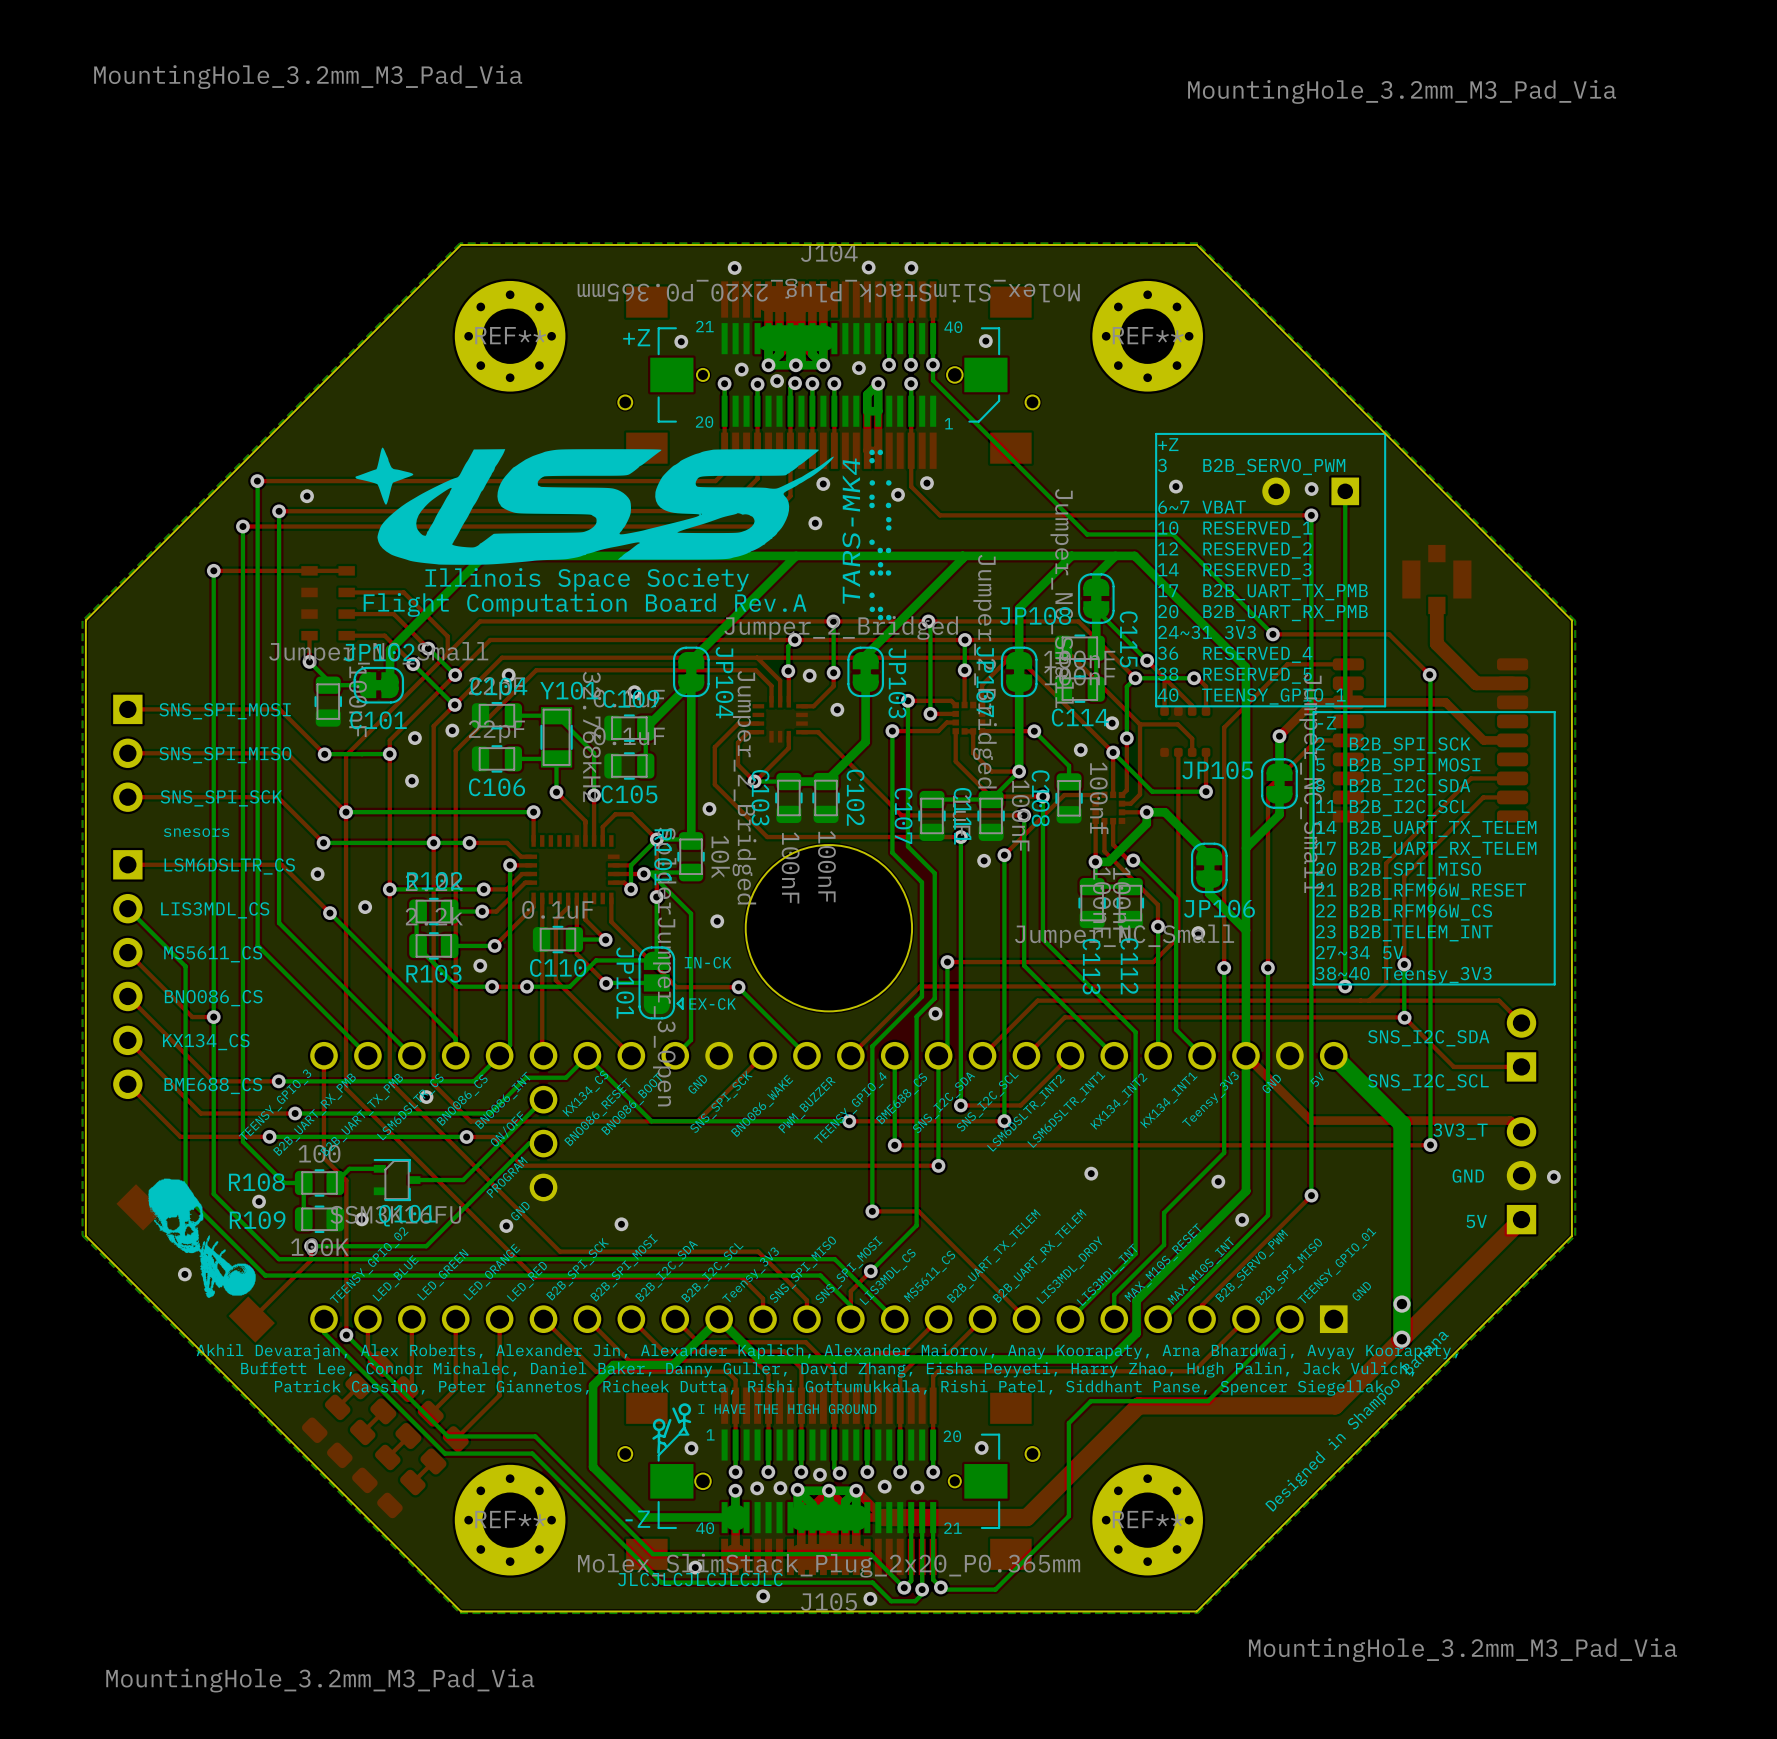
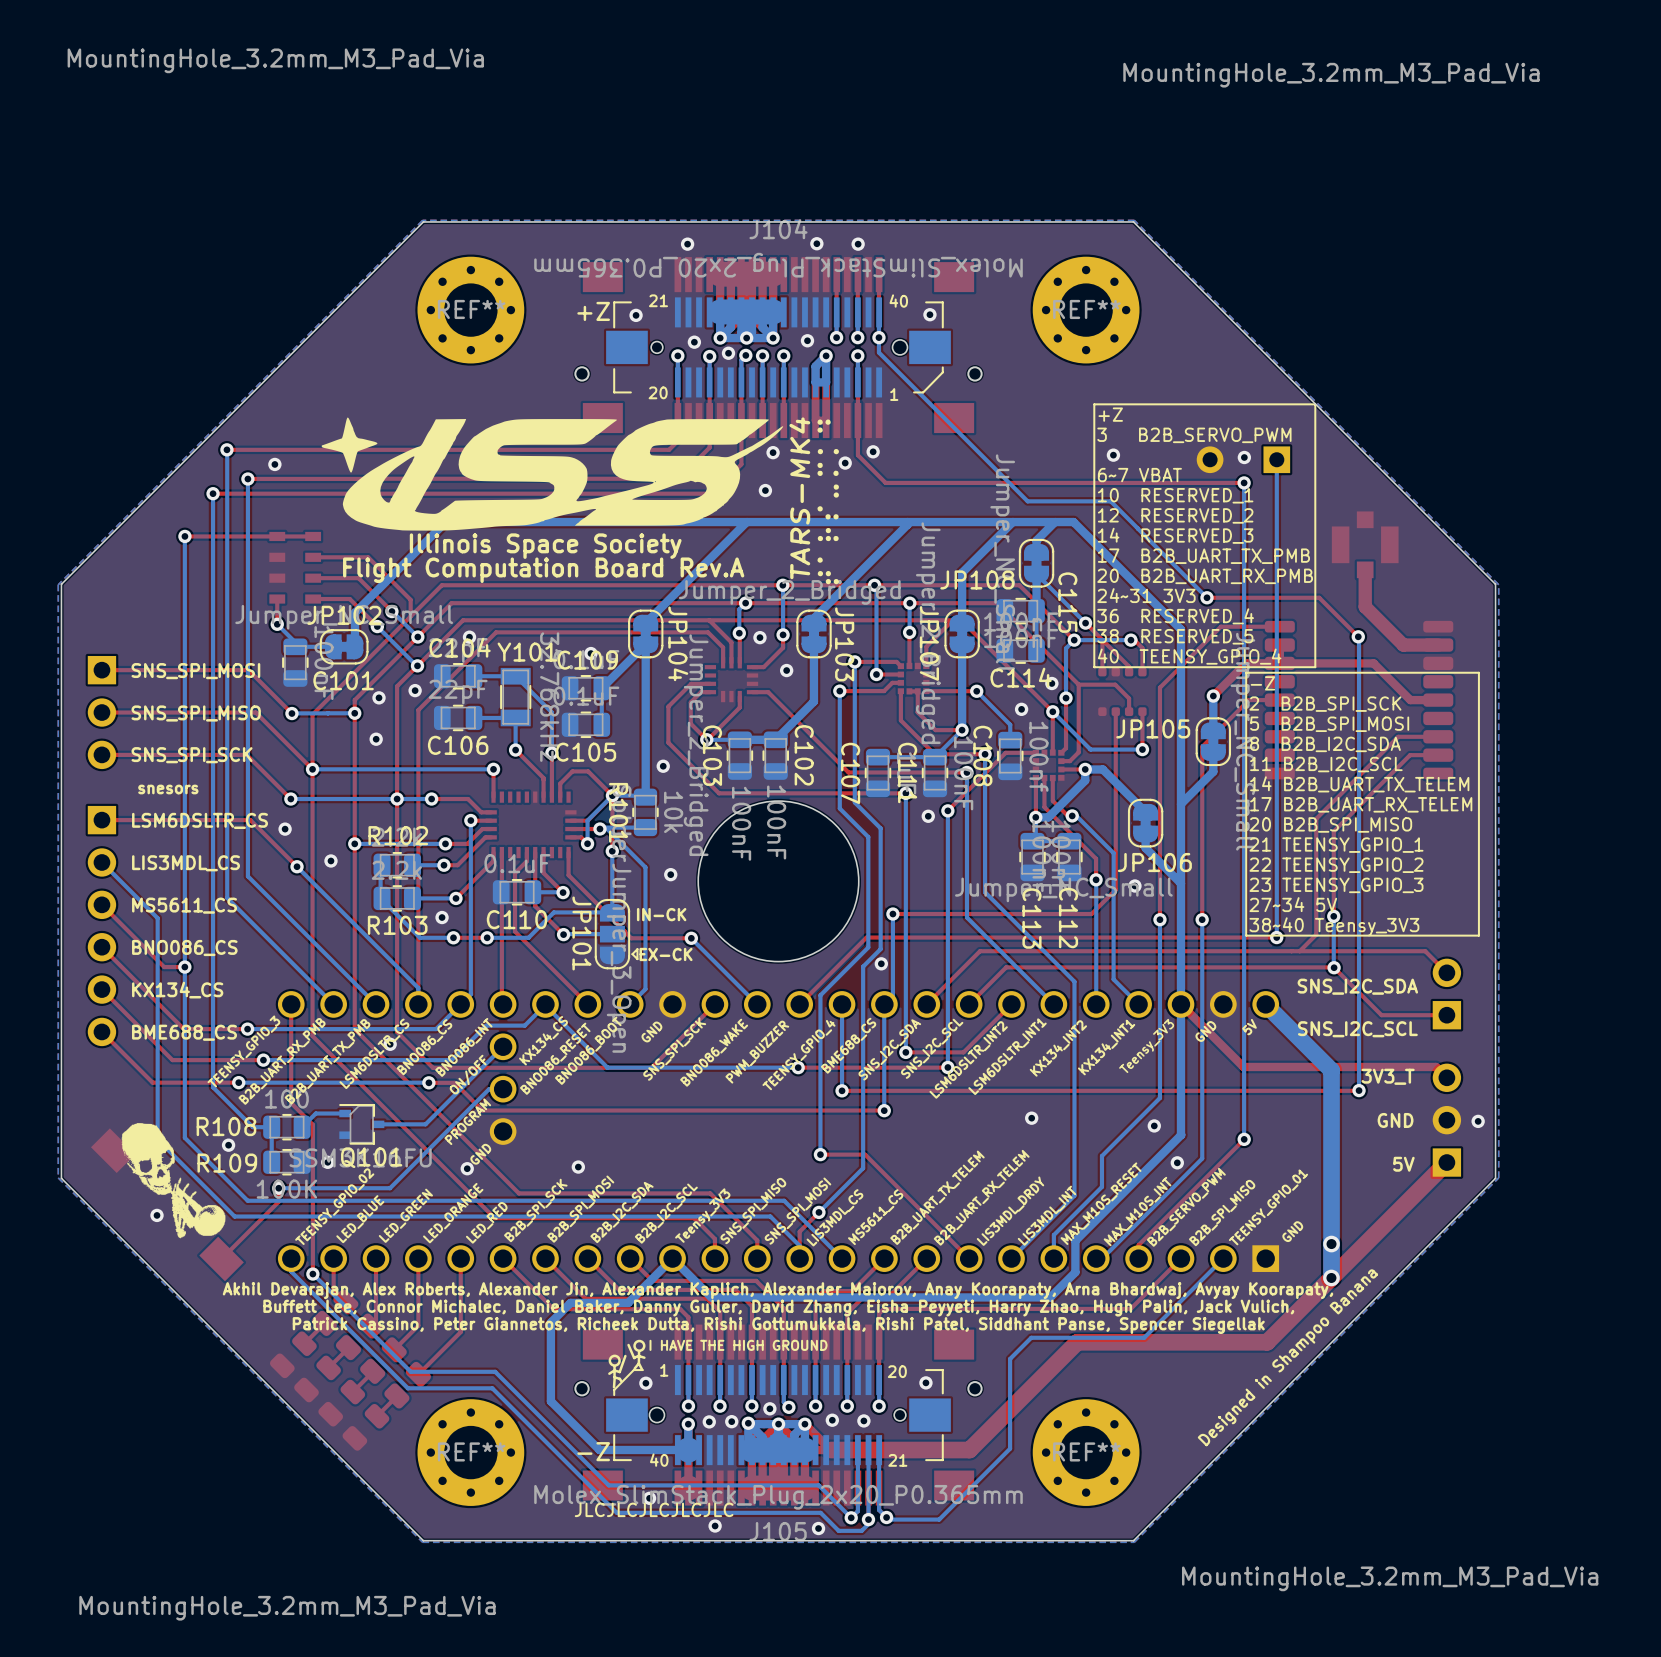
text: 40 TEENSY_GPIO_1 (1251, 696) -> 40 TEENSY_GPIO_4 (1189, 656)
text: 21 B2B_RFM96W_RESET (1421, 891) -> 21 TEENSY_GPIO_1 (1336, 845)
text: 22 B2B_RFM96W_CS (1404, 912) -> 22 TEENSY_GPIO_2 (1336, 865)
text: 23 B2B_TELEM_INT (1404, 933) -> 23 TEENSY_GPIO_3 (1336, 885)

